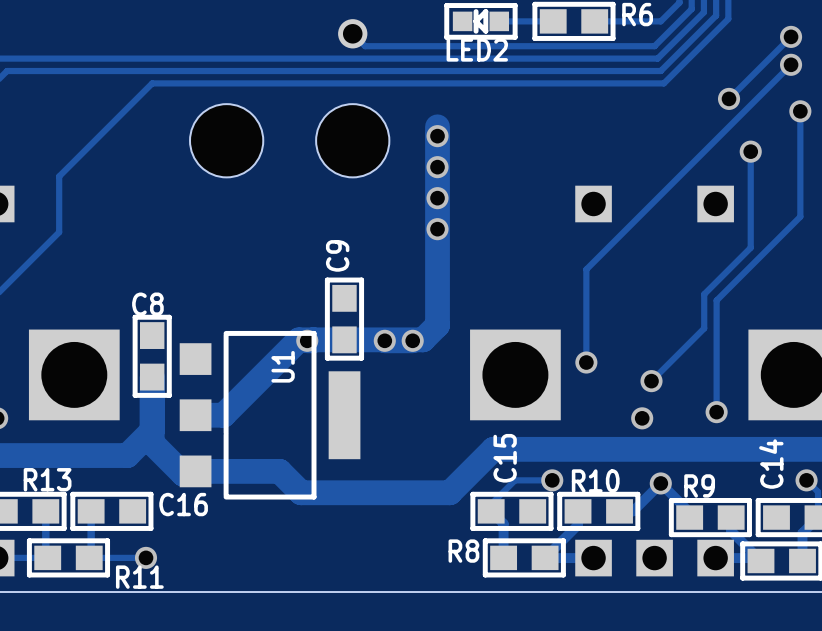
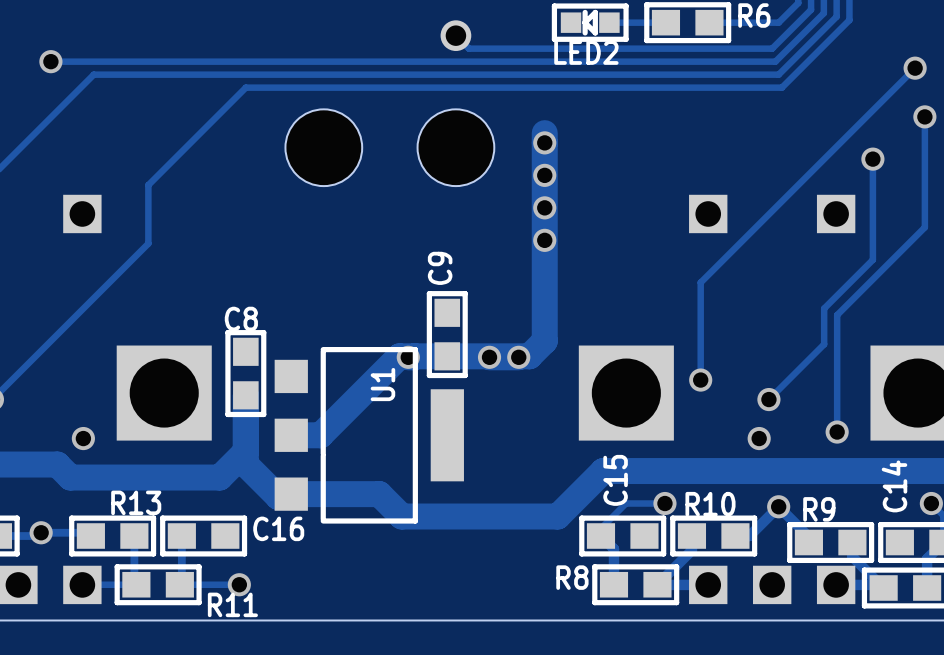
track: (791, 36) (729, 98) -> none
via: (791, 36) -> none
via: (729, 98) -> none

